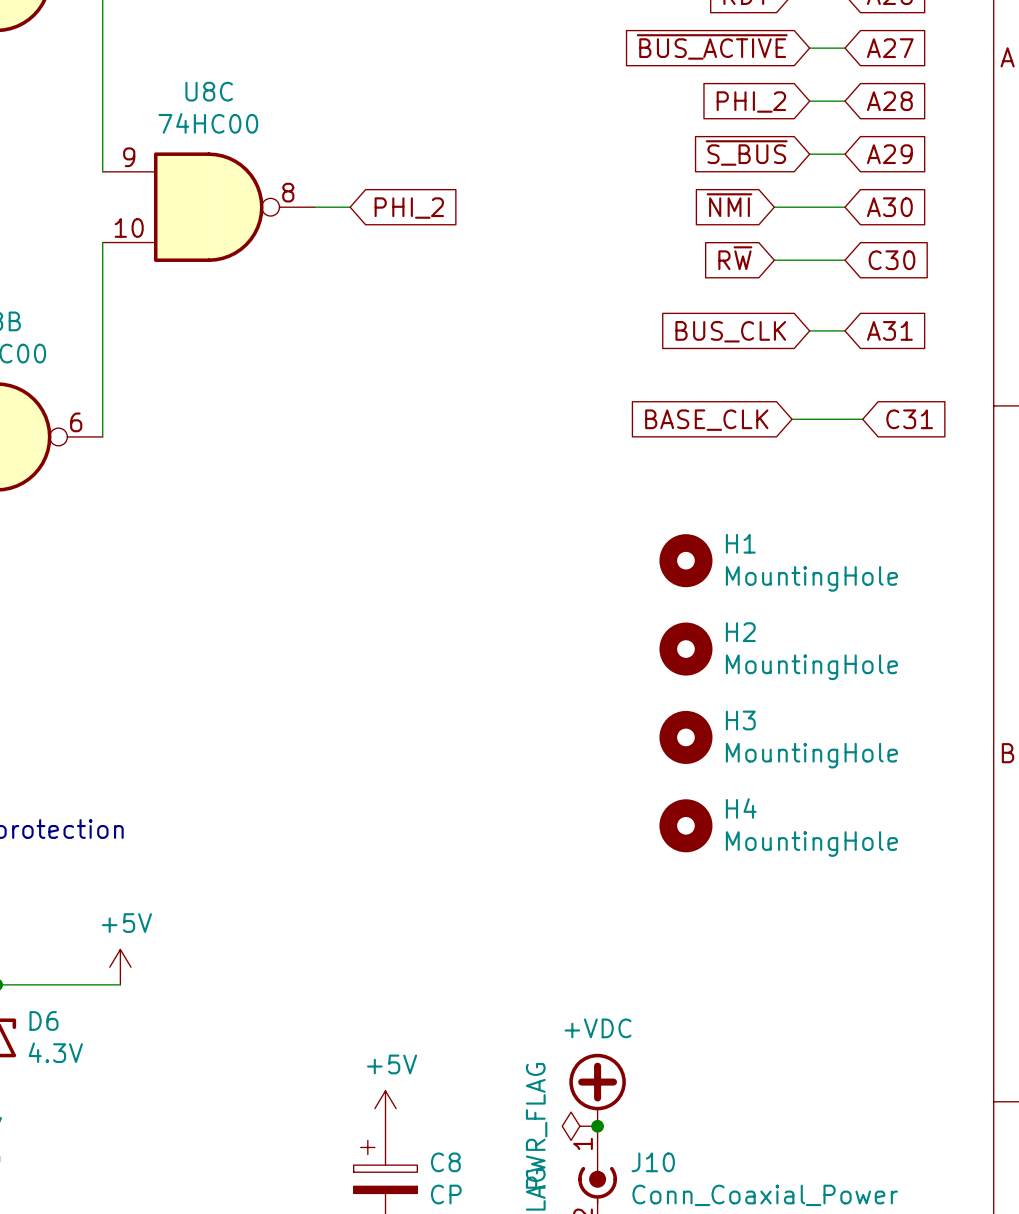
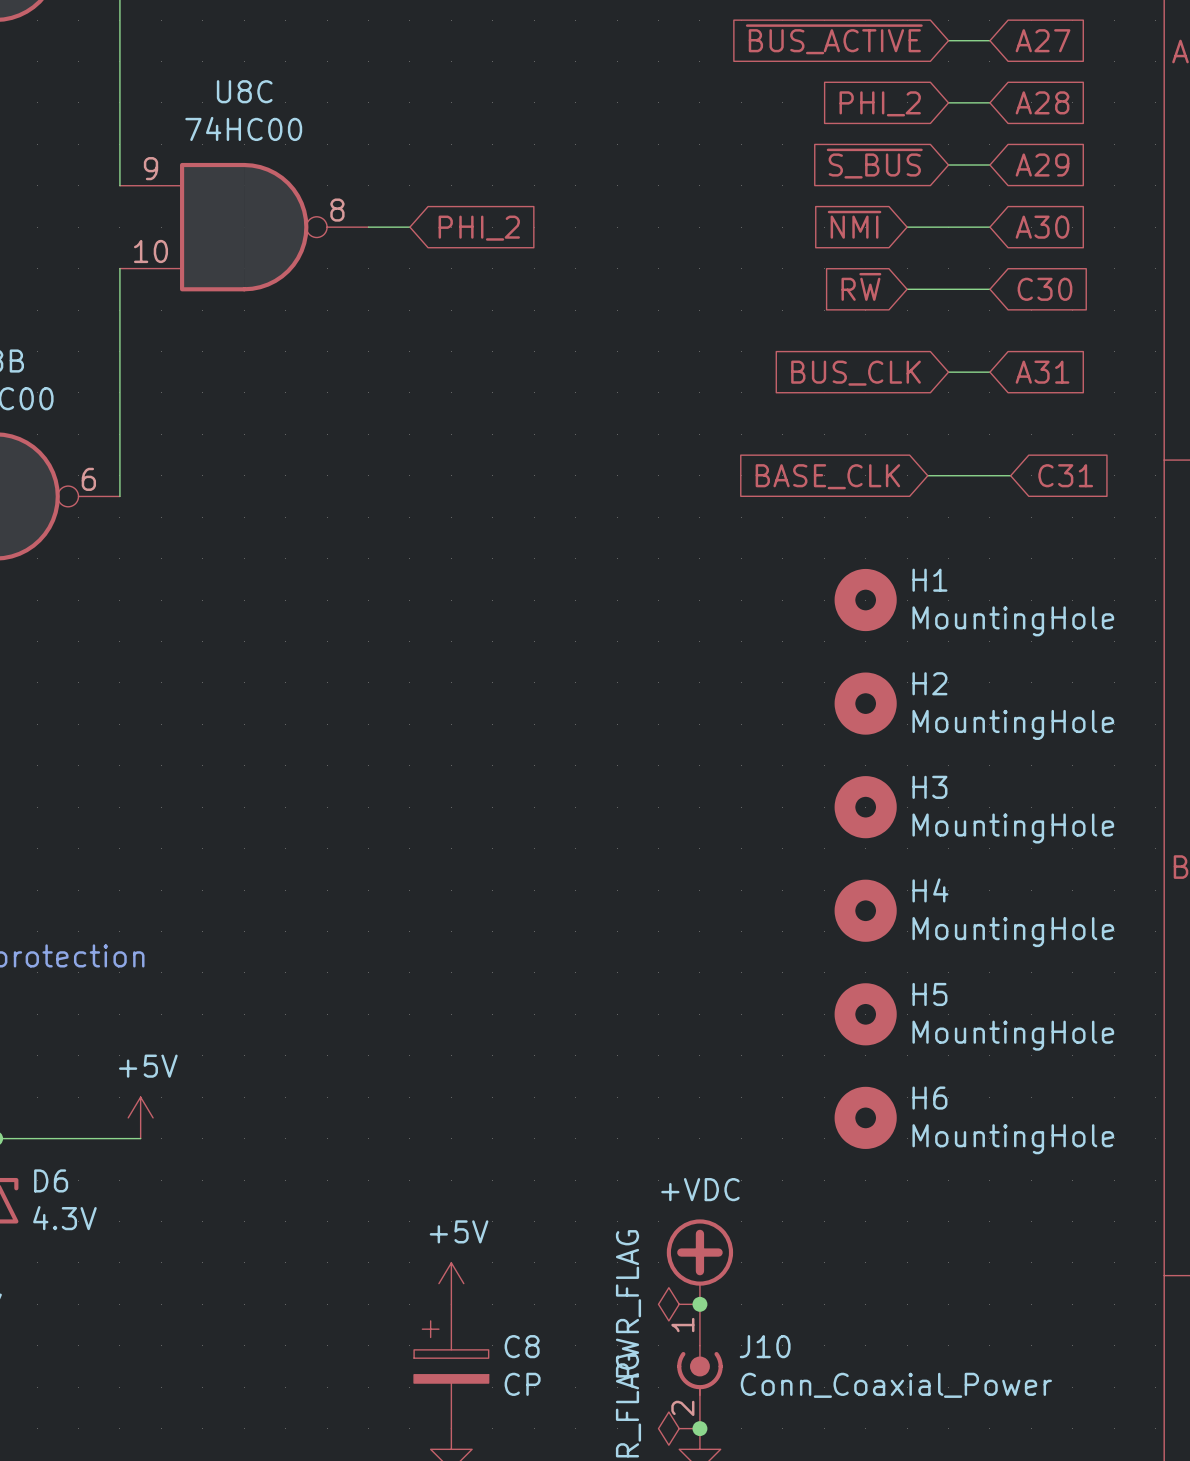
H1 position: (685, 560) -> (865, 600)
H2 position: (685, 649) -> (865, 703)
H3 position: (685, 737) -> (865, 807)
H4 position: (685, 825) -> (865, 910)
H5: none -> MountingHole (865, 1014)
H6: none -> MountingHole (865, 1117)

